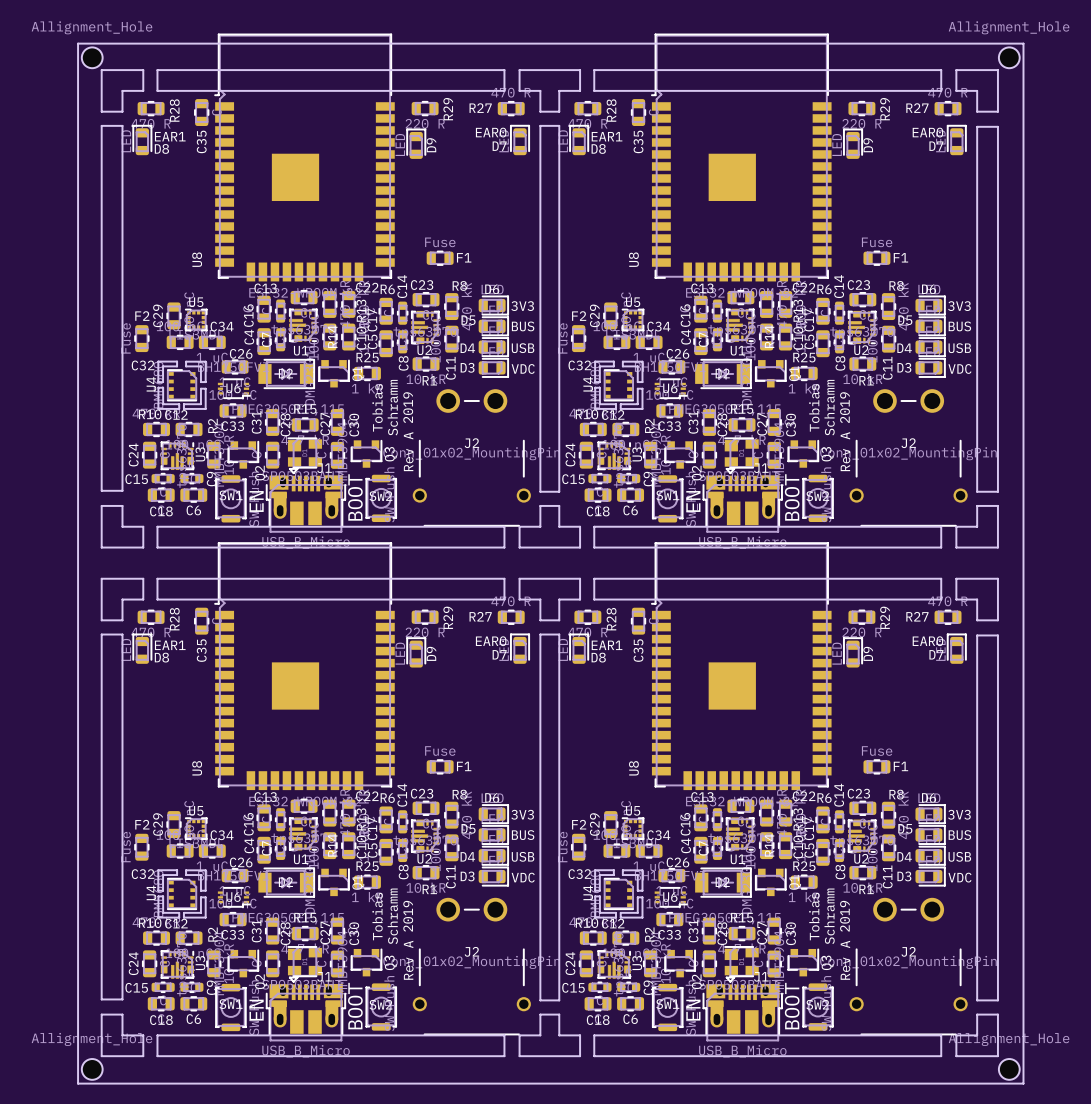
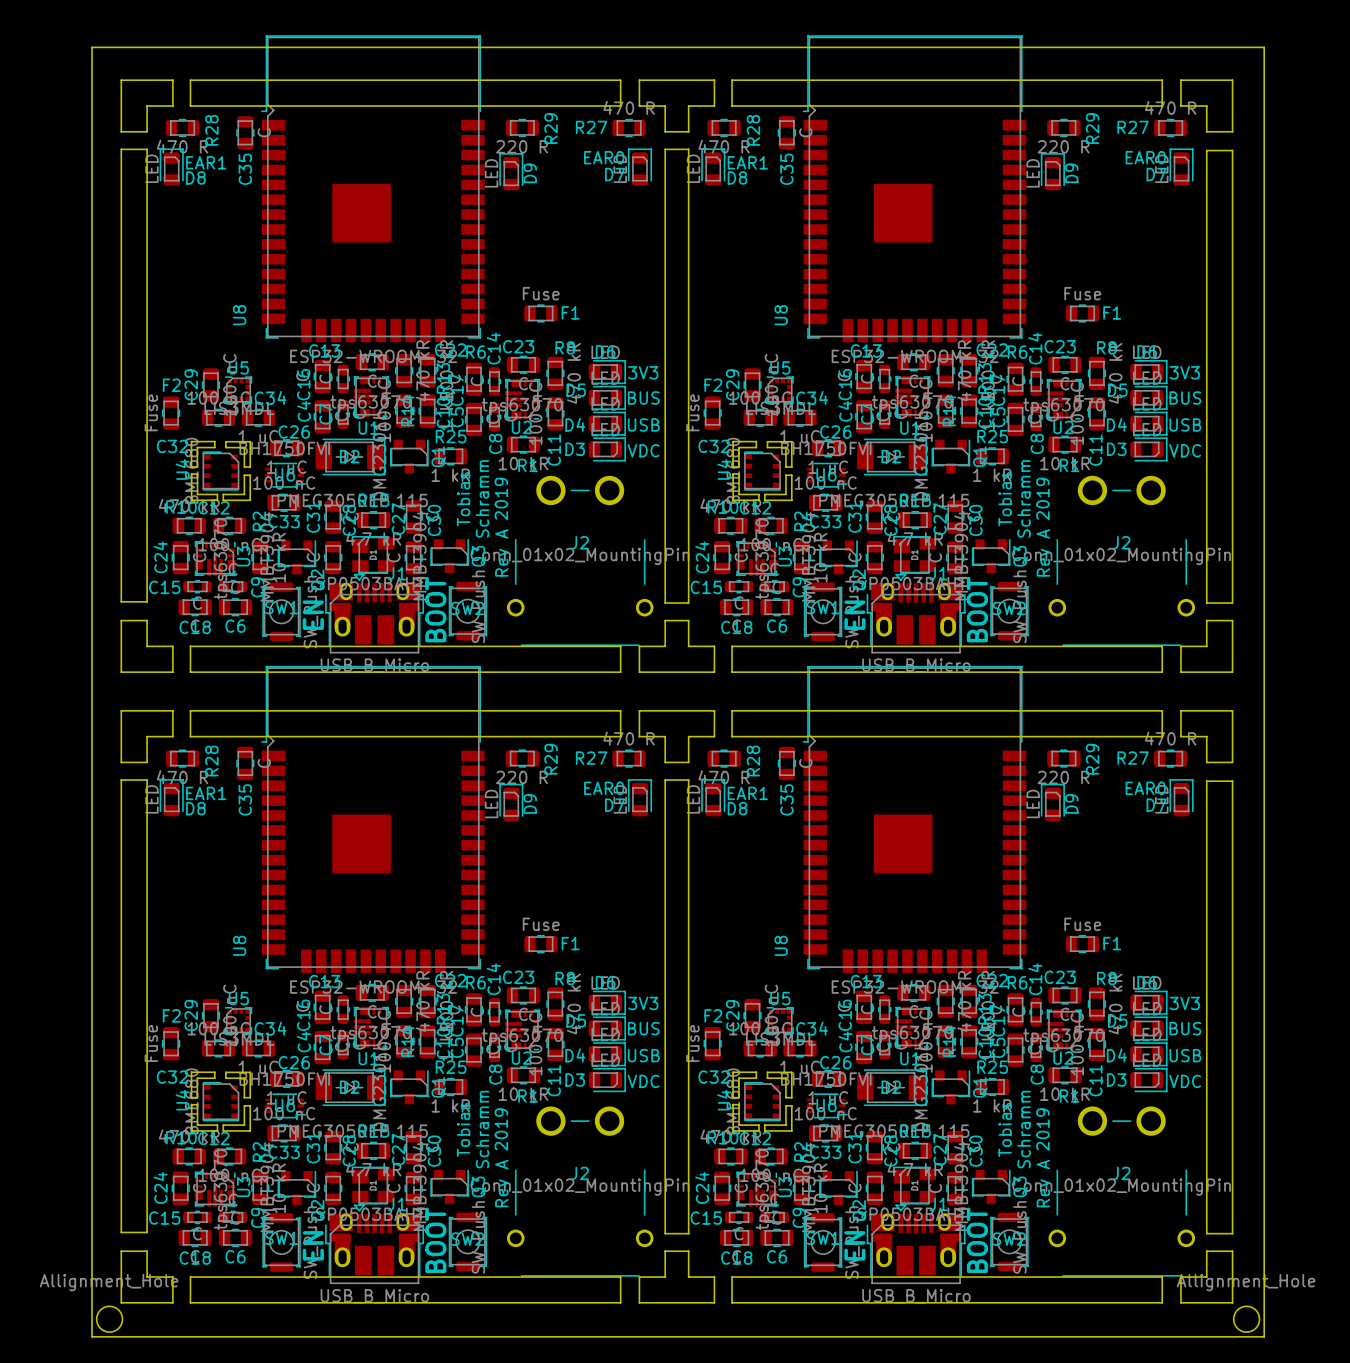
part: Allignment_Hole (92, 57) -> none
part: Allignment_Hole (1009, 57) -> none

